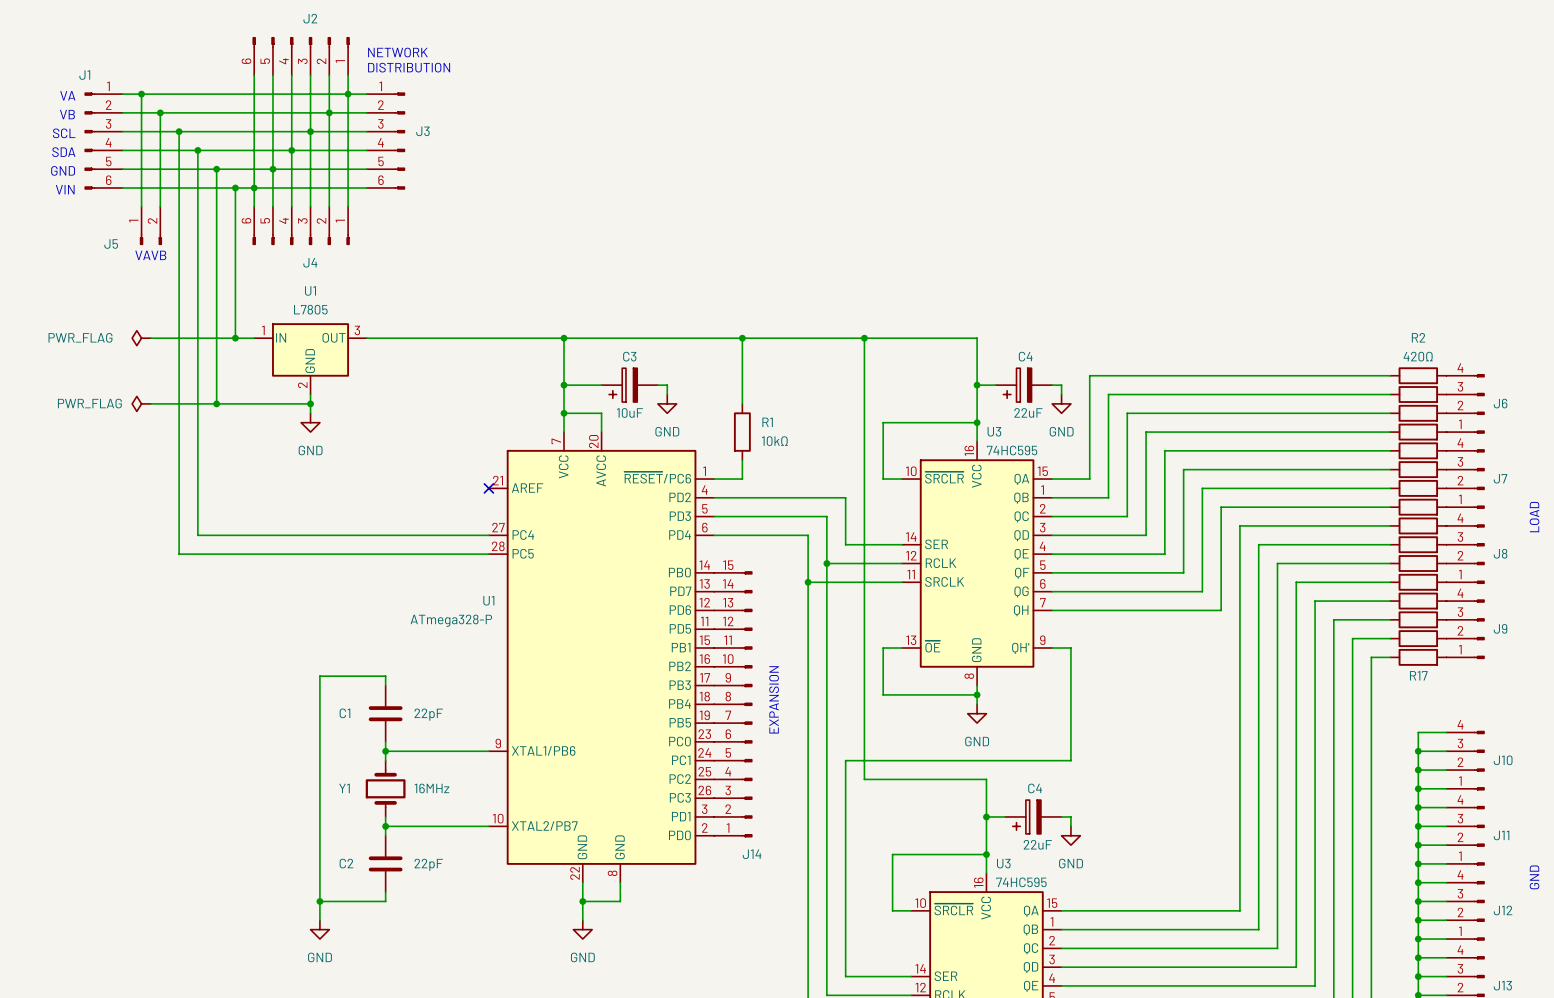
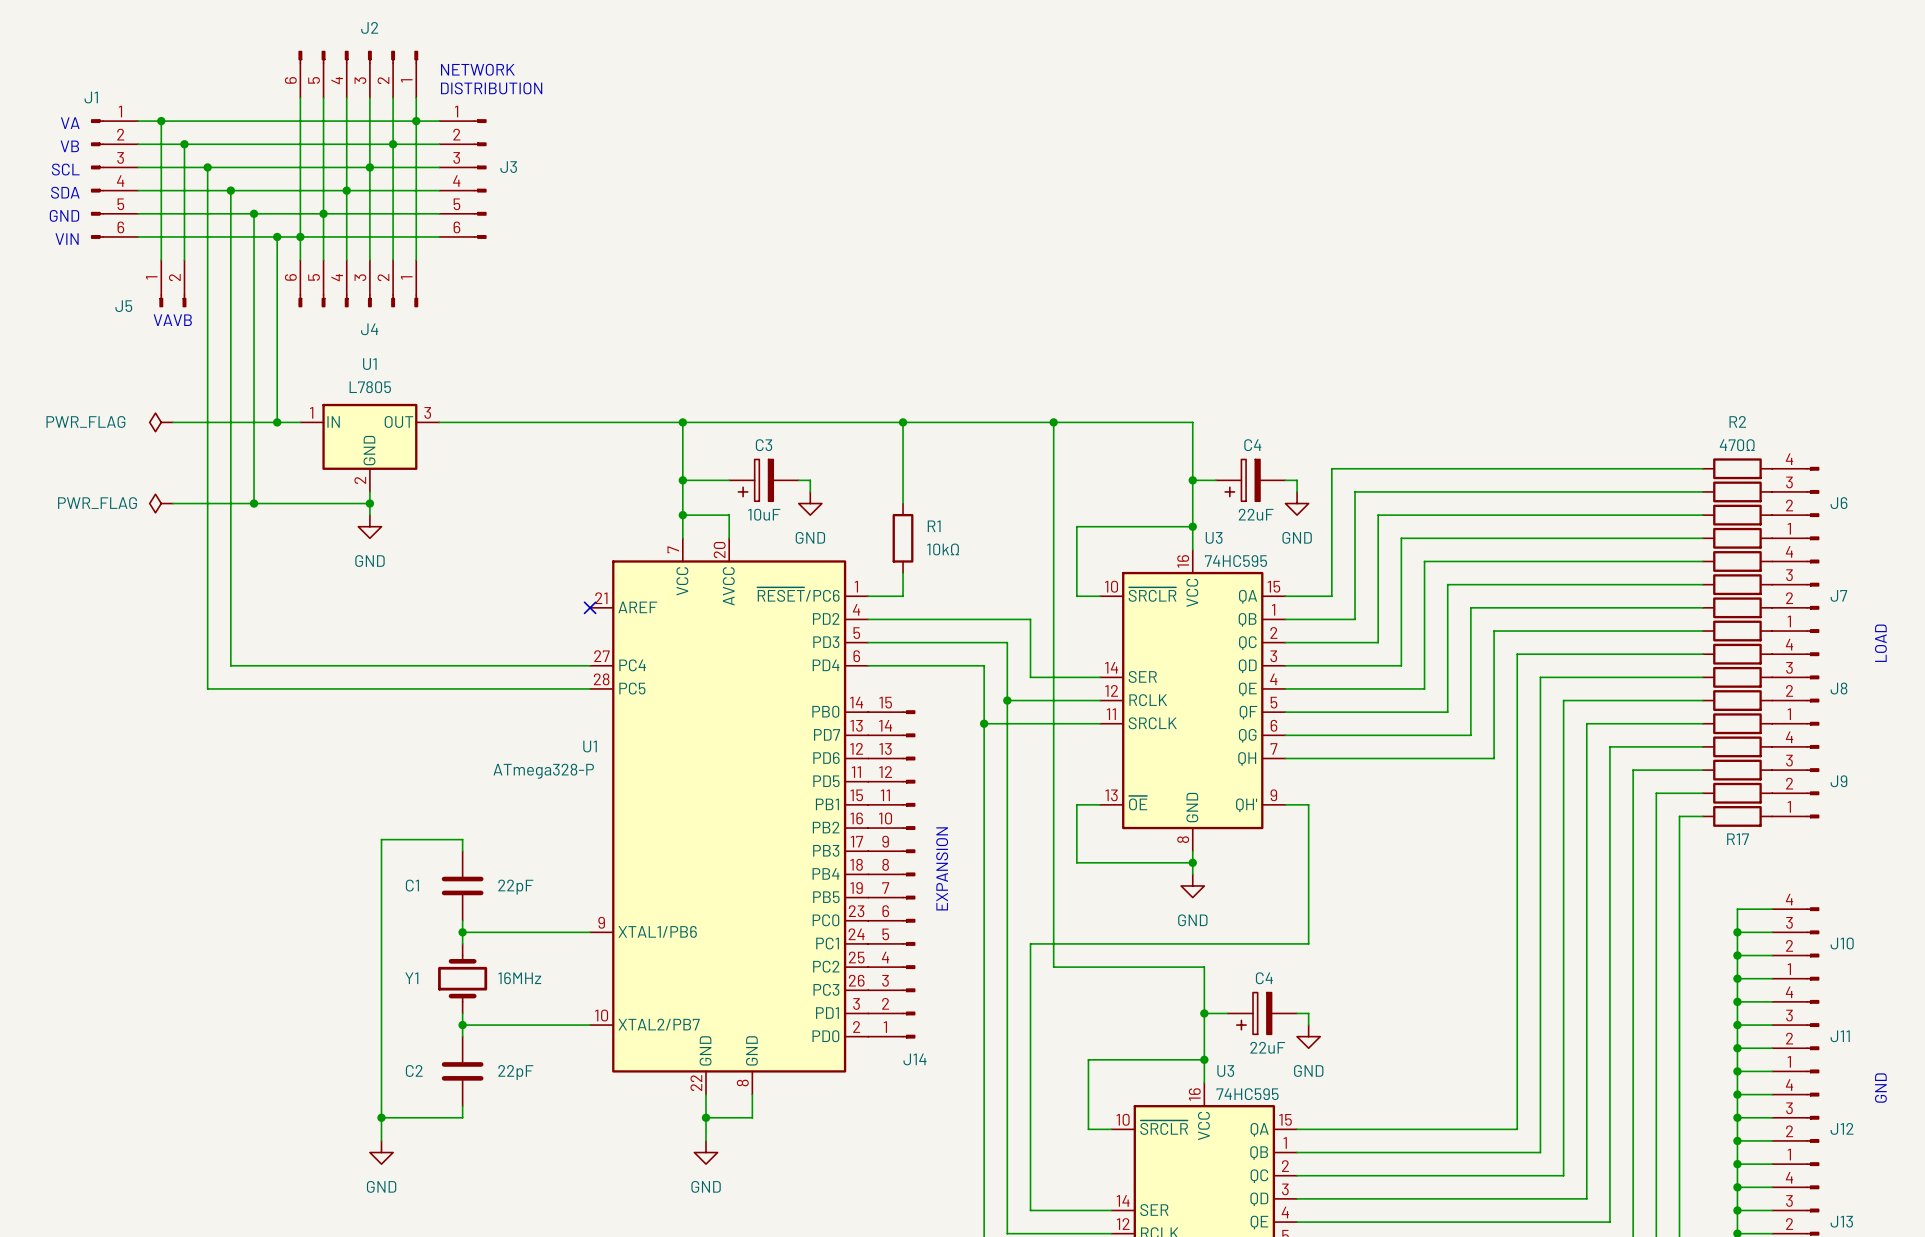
R2 value: 420Ω (1418, 356) -> 470Ω (1737, 445)

